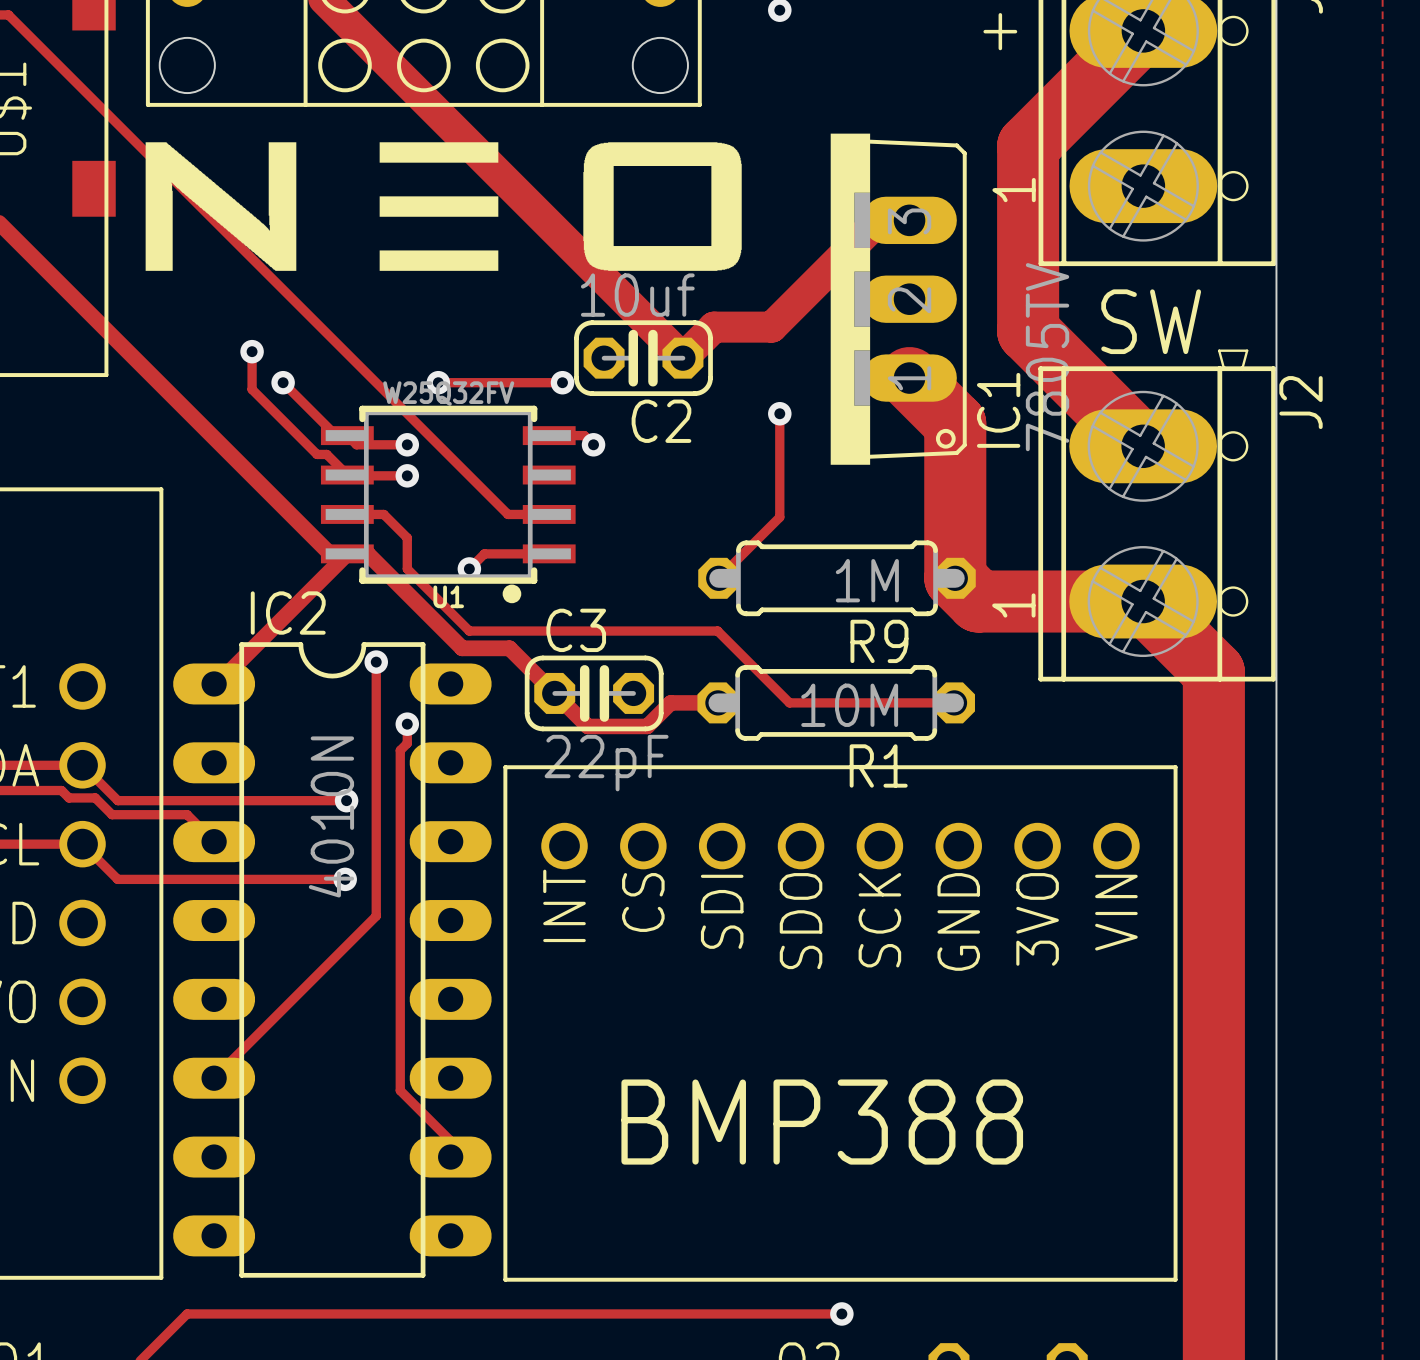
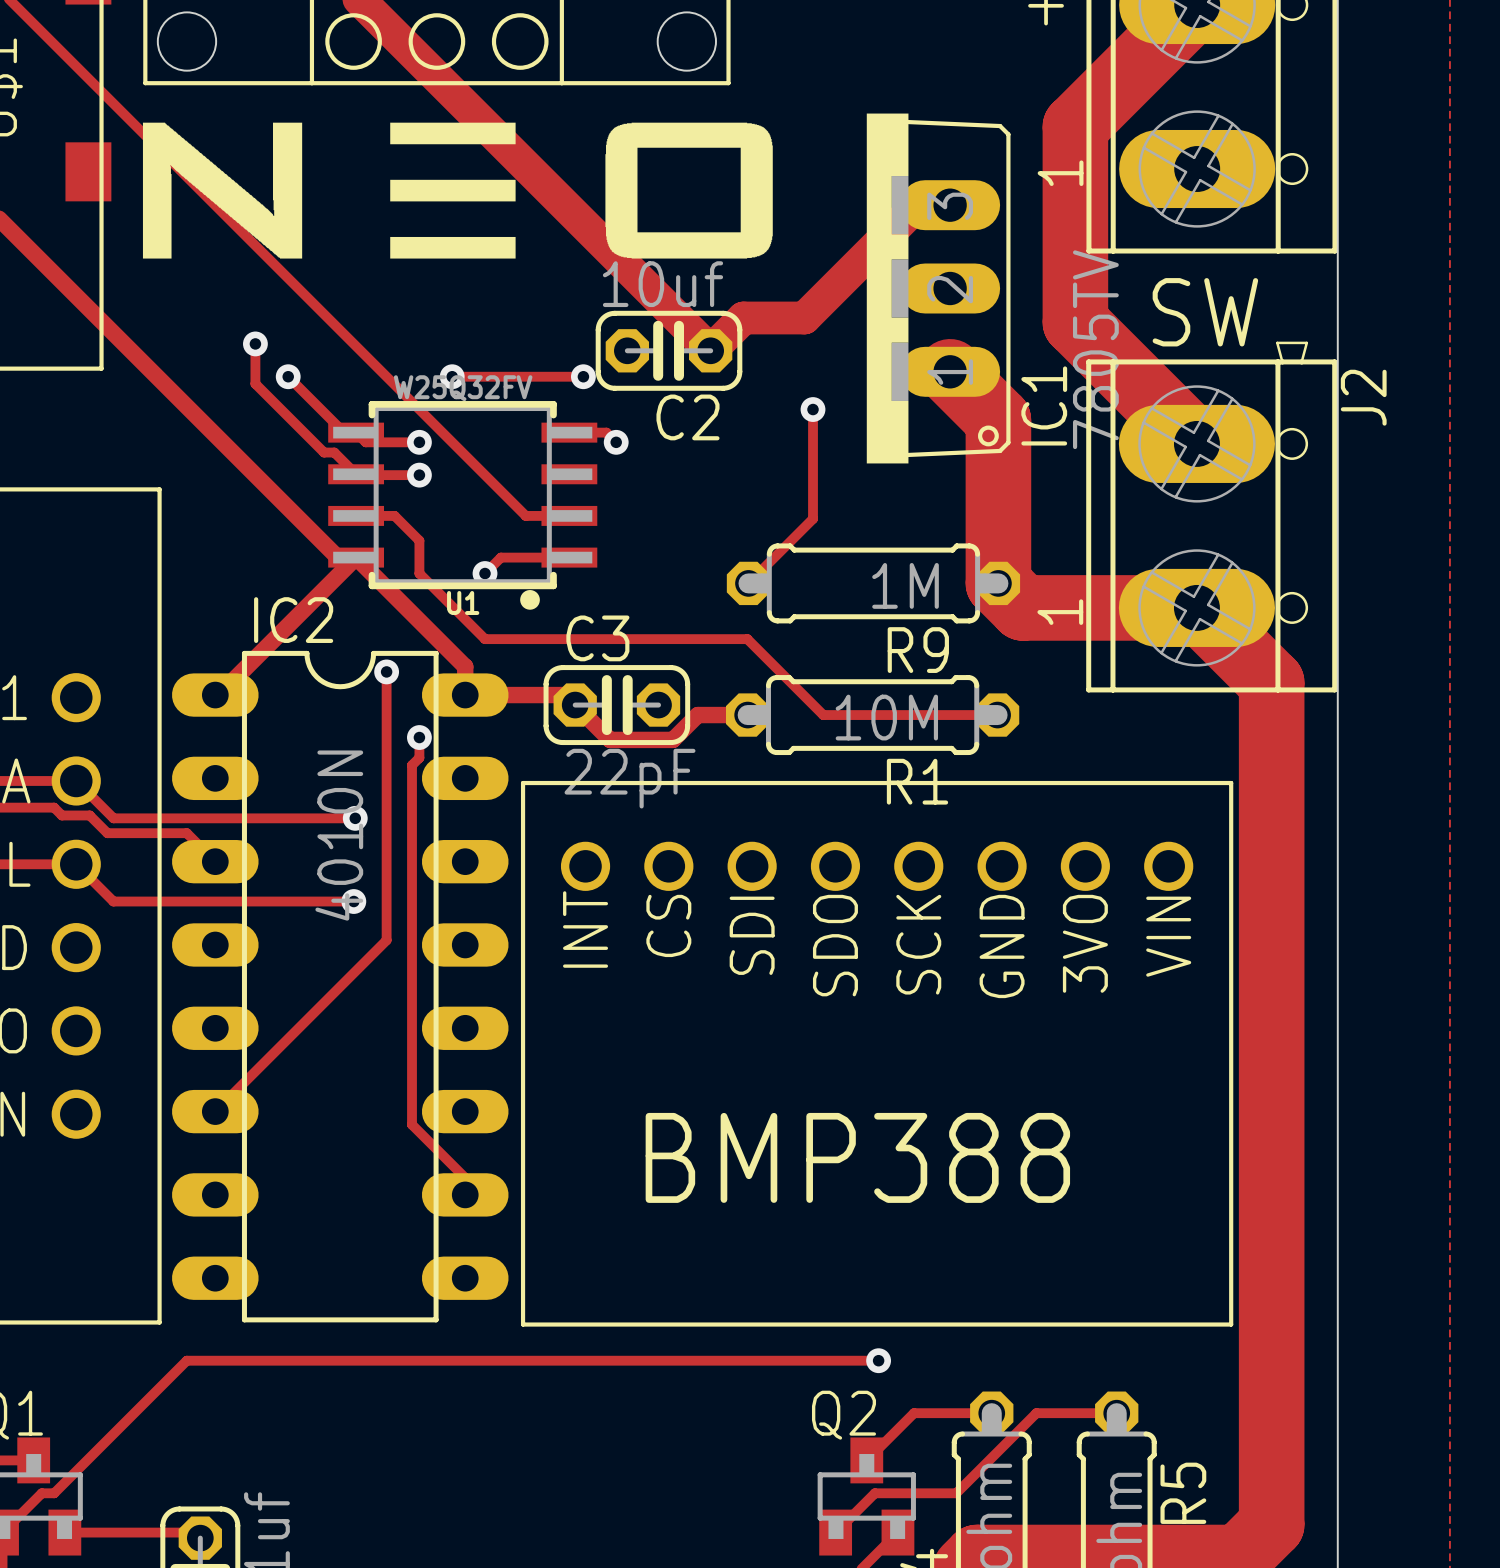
track: (347, 553) (367, 553) (462, 648) (509, 648) (554, 693) -> (356, 557) (465, 666) (465, 695) (565, 695)

